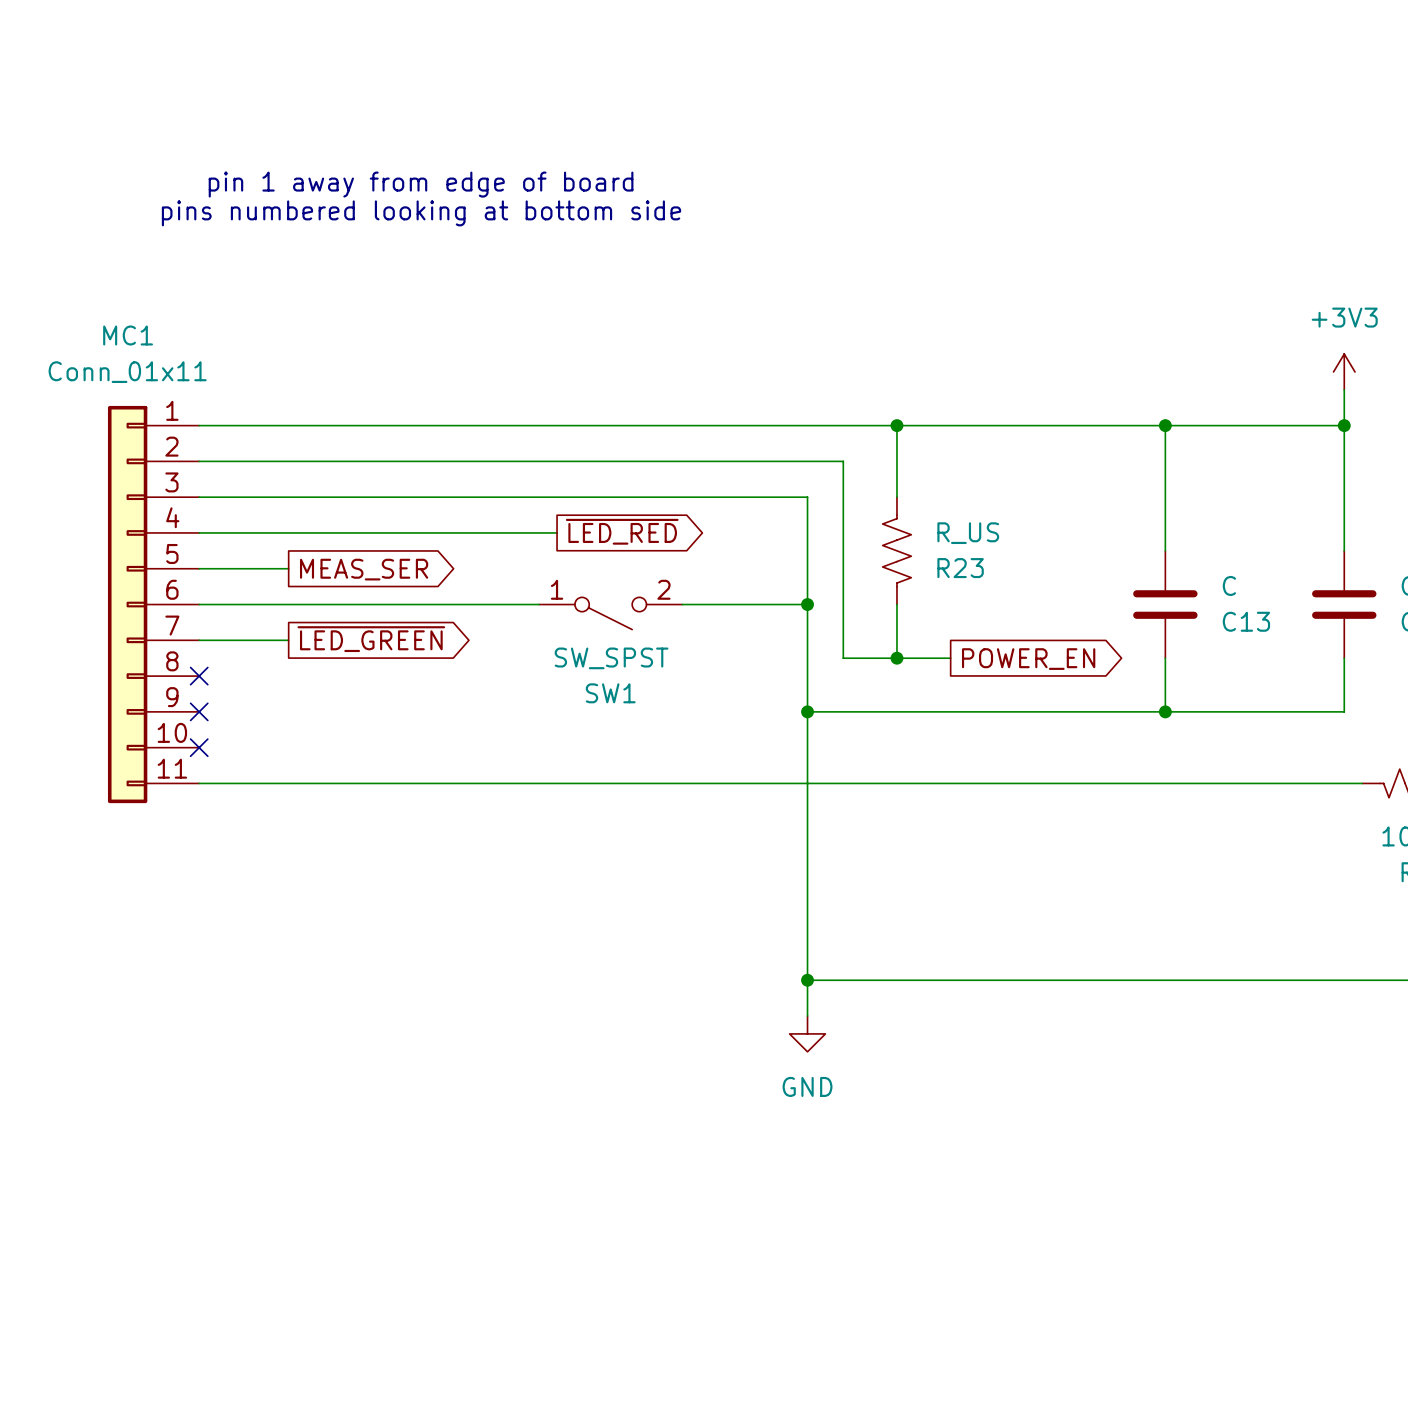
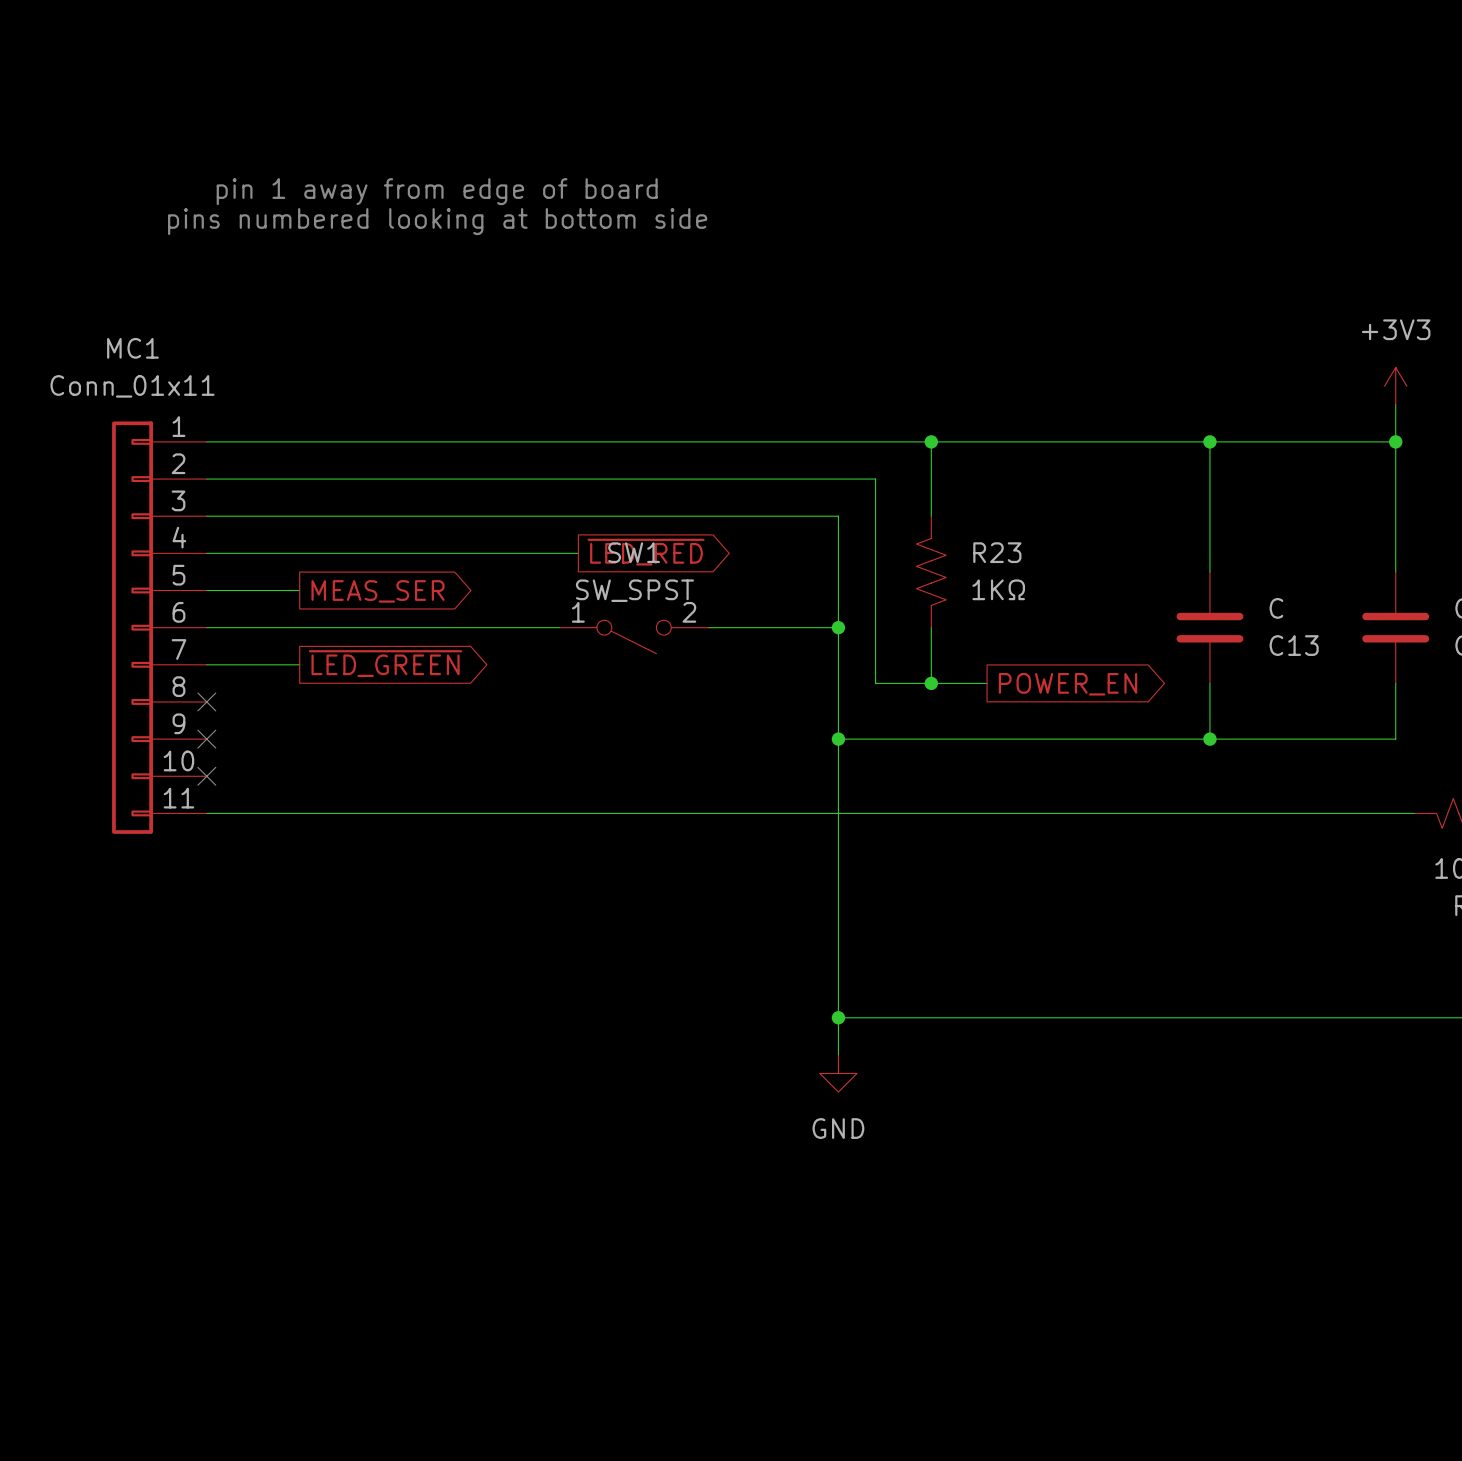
R23 value: R_US (968, 533) -> 1KΩ (998, 589)
R23 name position: R23 (960, 568) -> R23 (997, 552)
SW1 value position: SW_SPST (611, 658) -> SW_SPST (634, 590)
SW1 name position: SW1 (610, 693) -> SW1 (634, 552)

